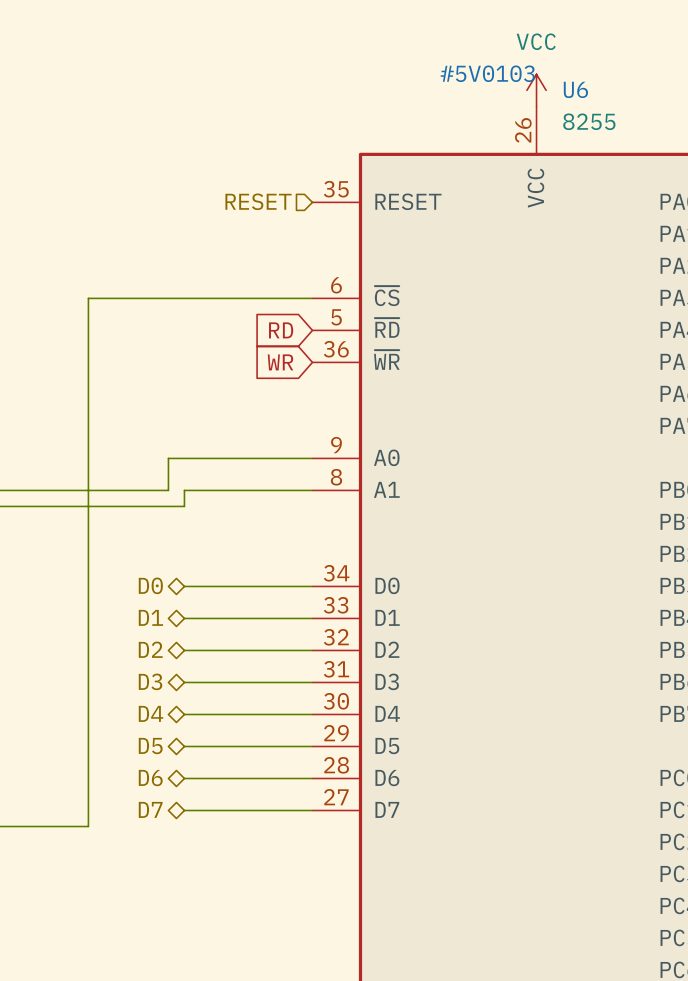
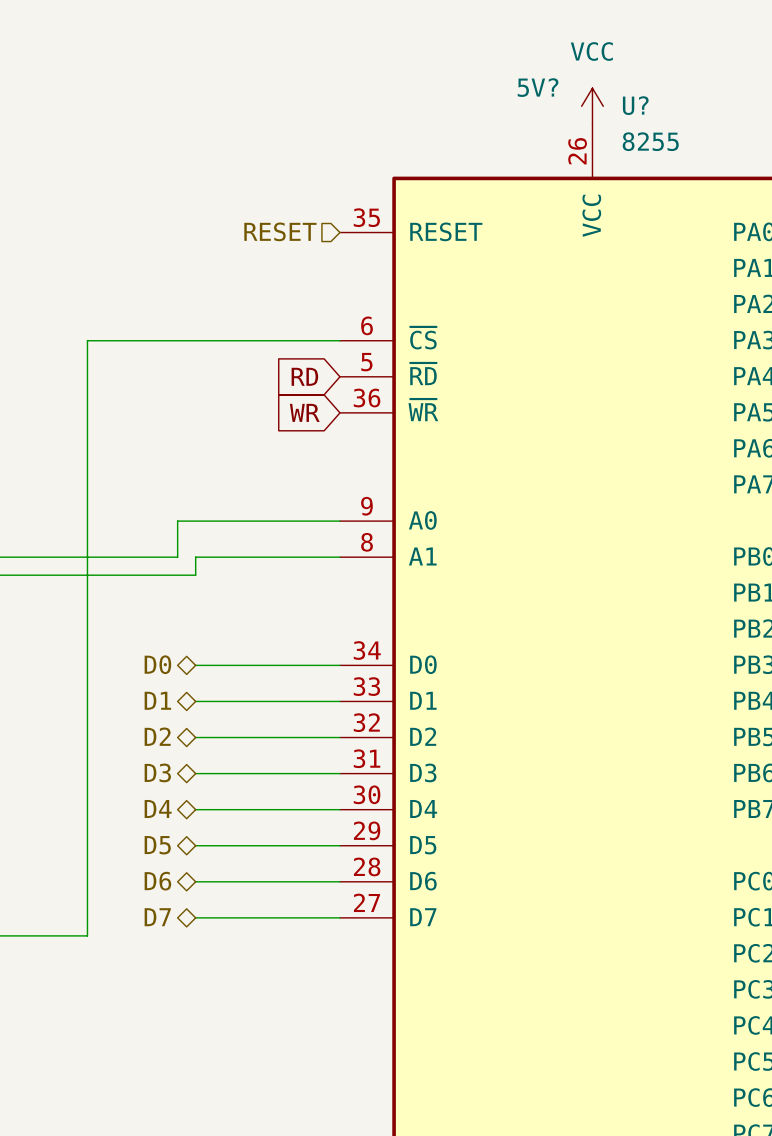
#5V0103 name: #5V0103 (487, 73) -> 5V? (538, 87)
U6 name: U6 (575, 89) -> U? (635, 105)

